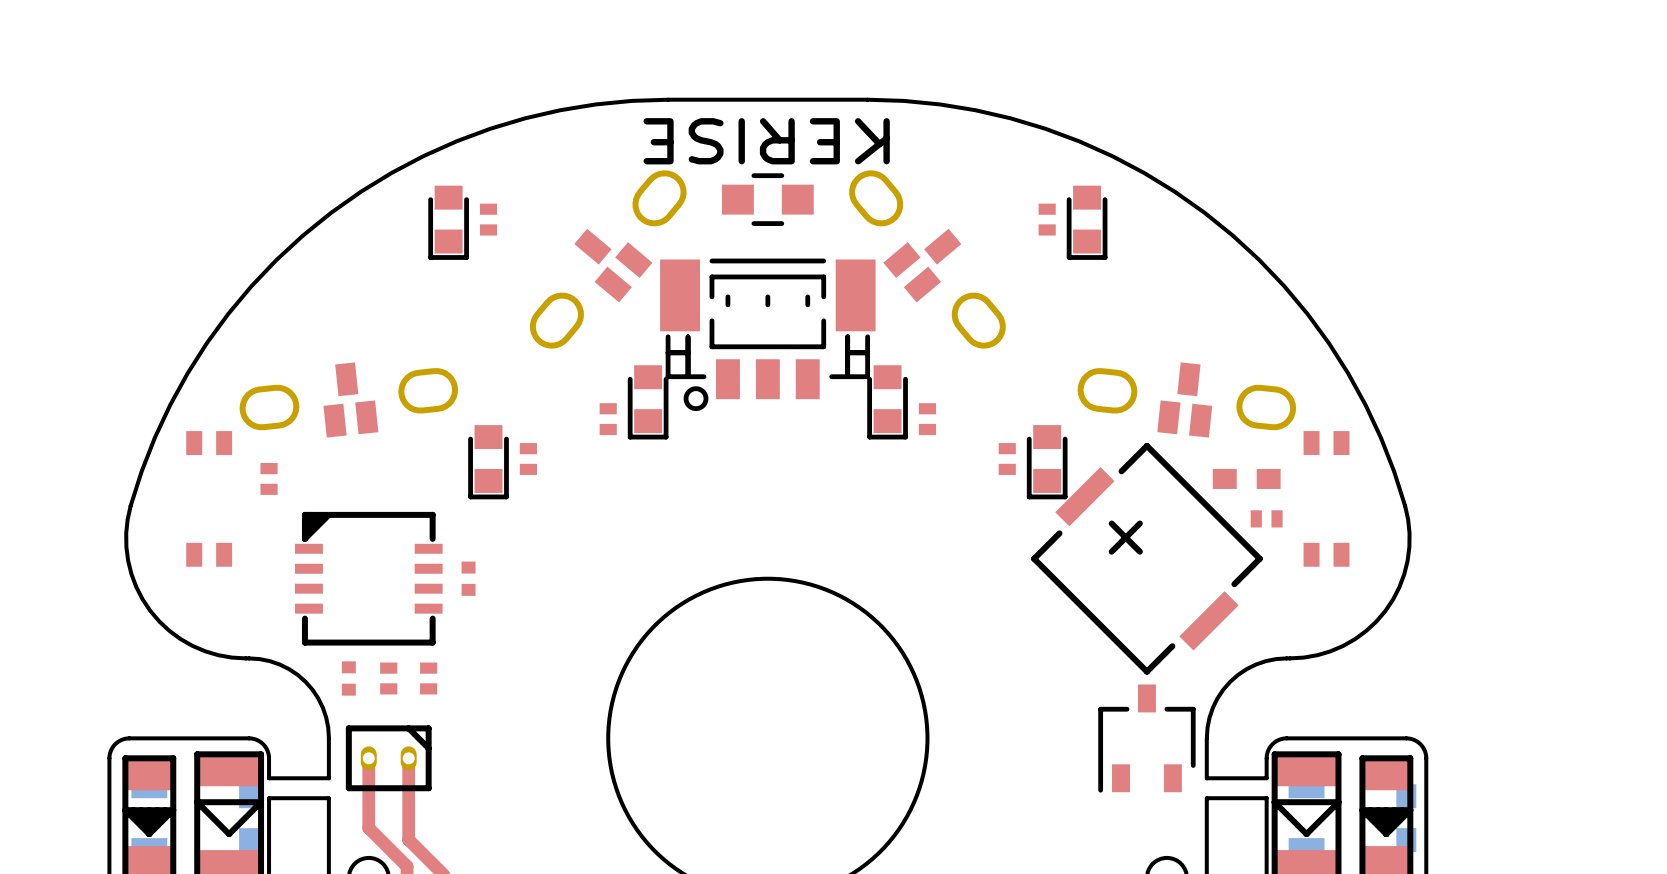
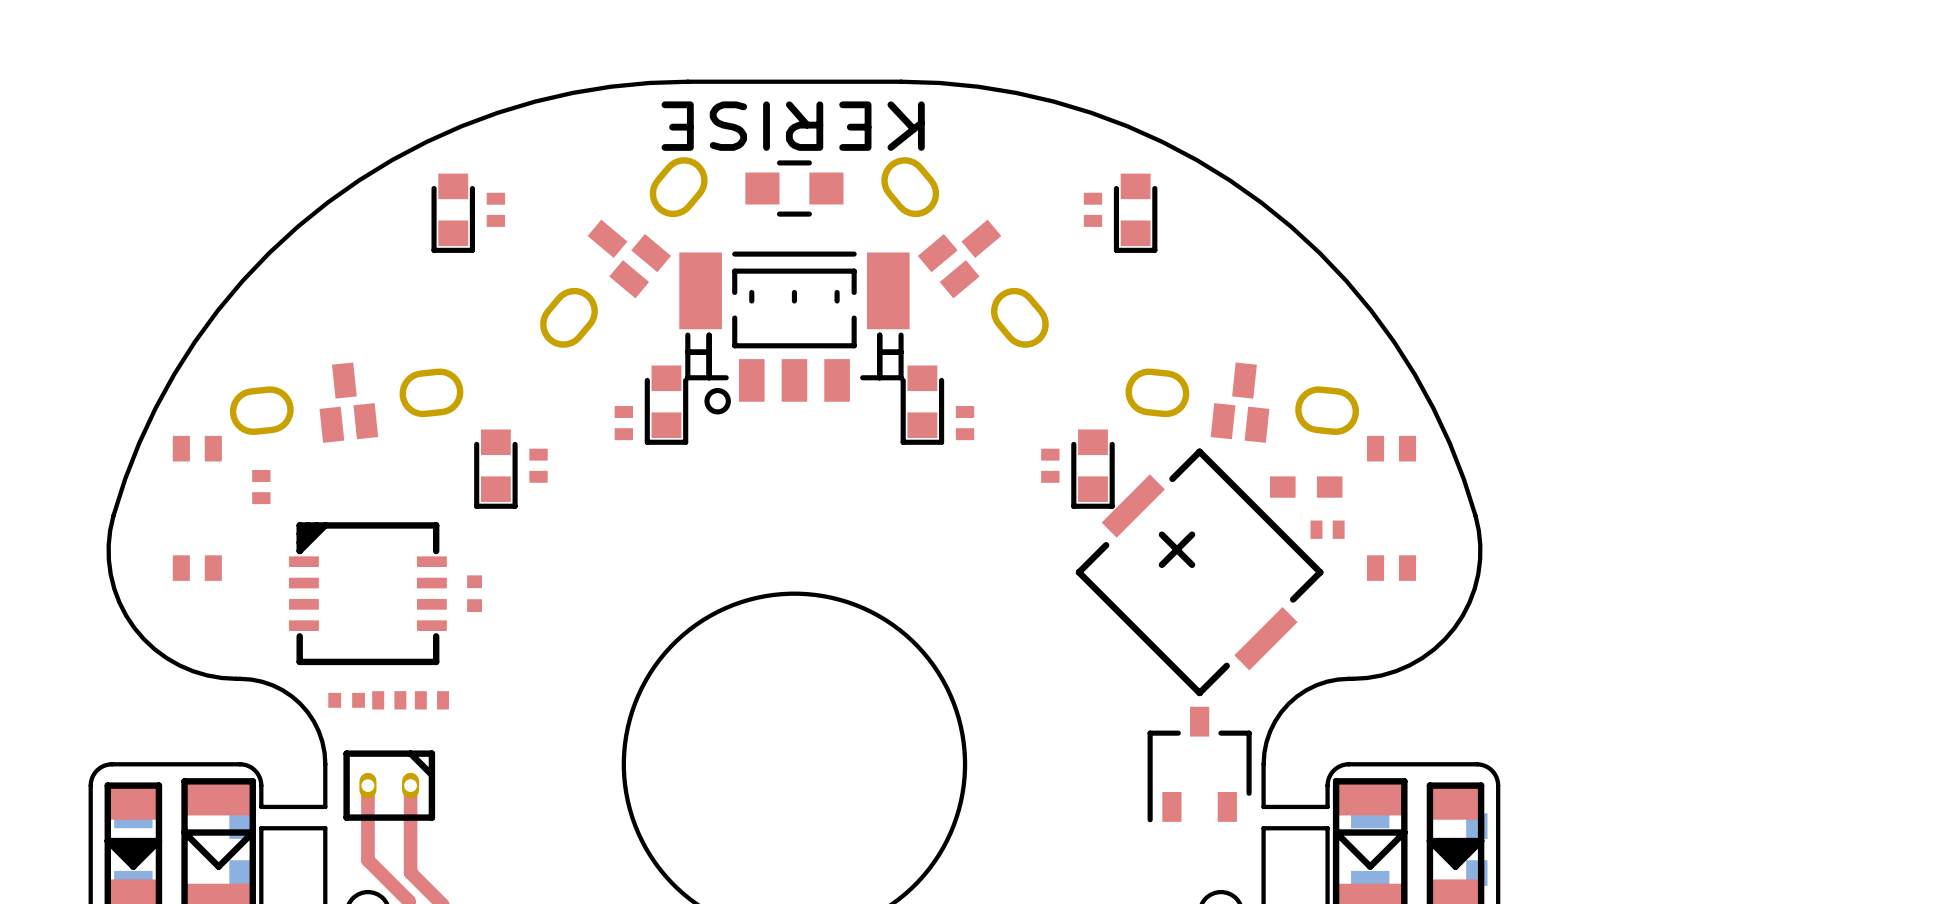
part rotation: 0° (348, 678) -> 90° clockwise (346, 700)
part rotation: 0° (388, 678) -> 90° clockwise (389, 700)
part rotation: 0° (428, 678) -> 90° clockwise (431, 700)

